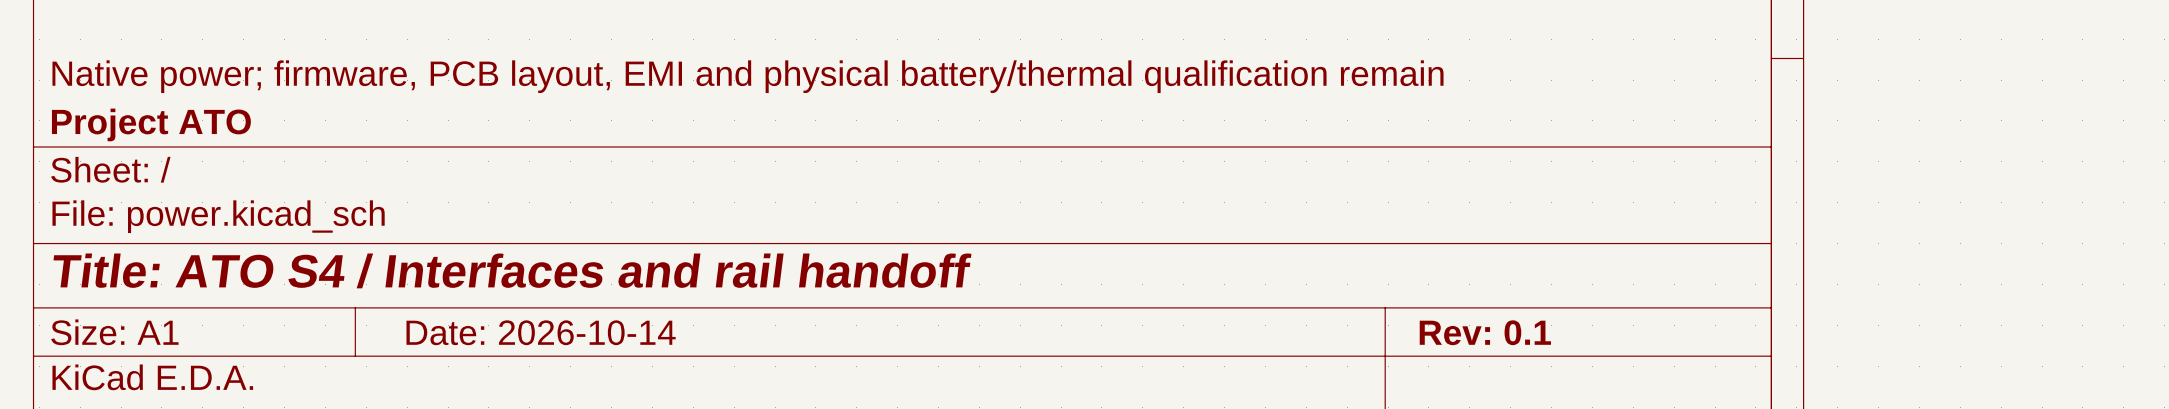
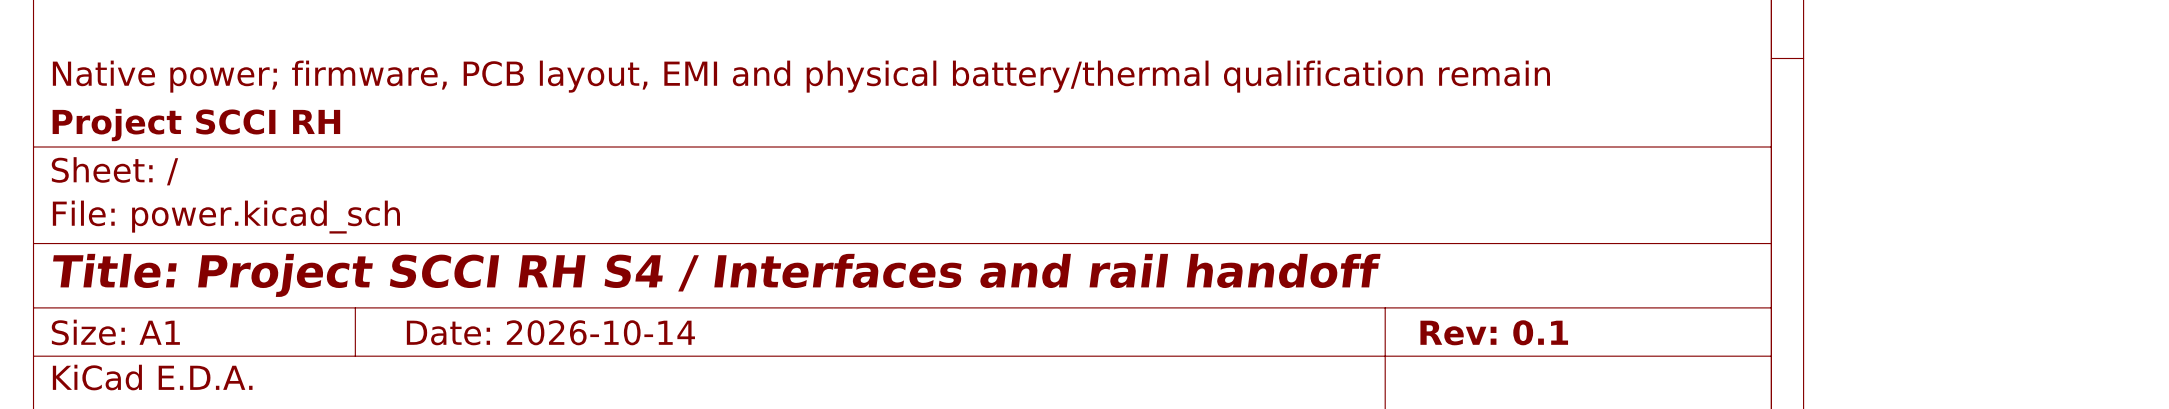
title block: Project ATO (151, 124) -> Project SCCI RH (196, 125)
title block: Title: ATO S4 / Interfaces and rail handoff (512, 270) -> Title: Project SCCI RH S4 / Interfaces and rail handoff (716, 275)

